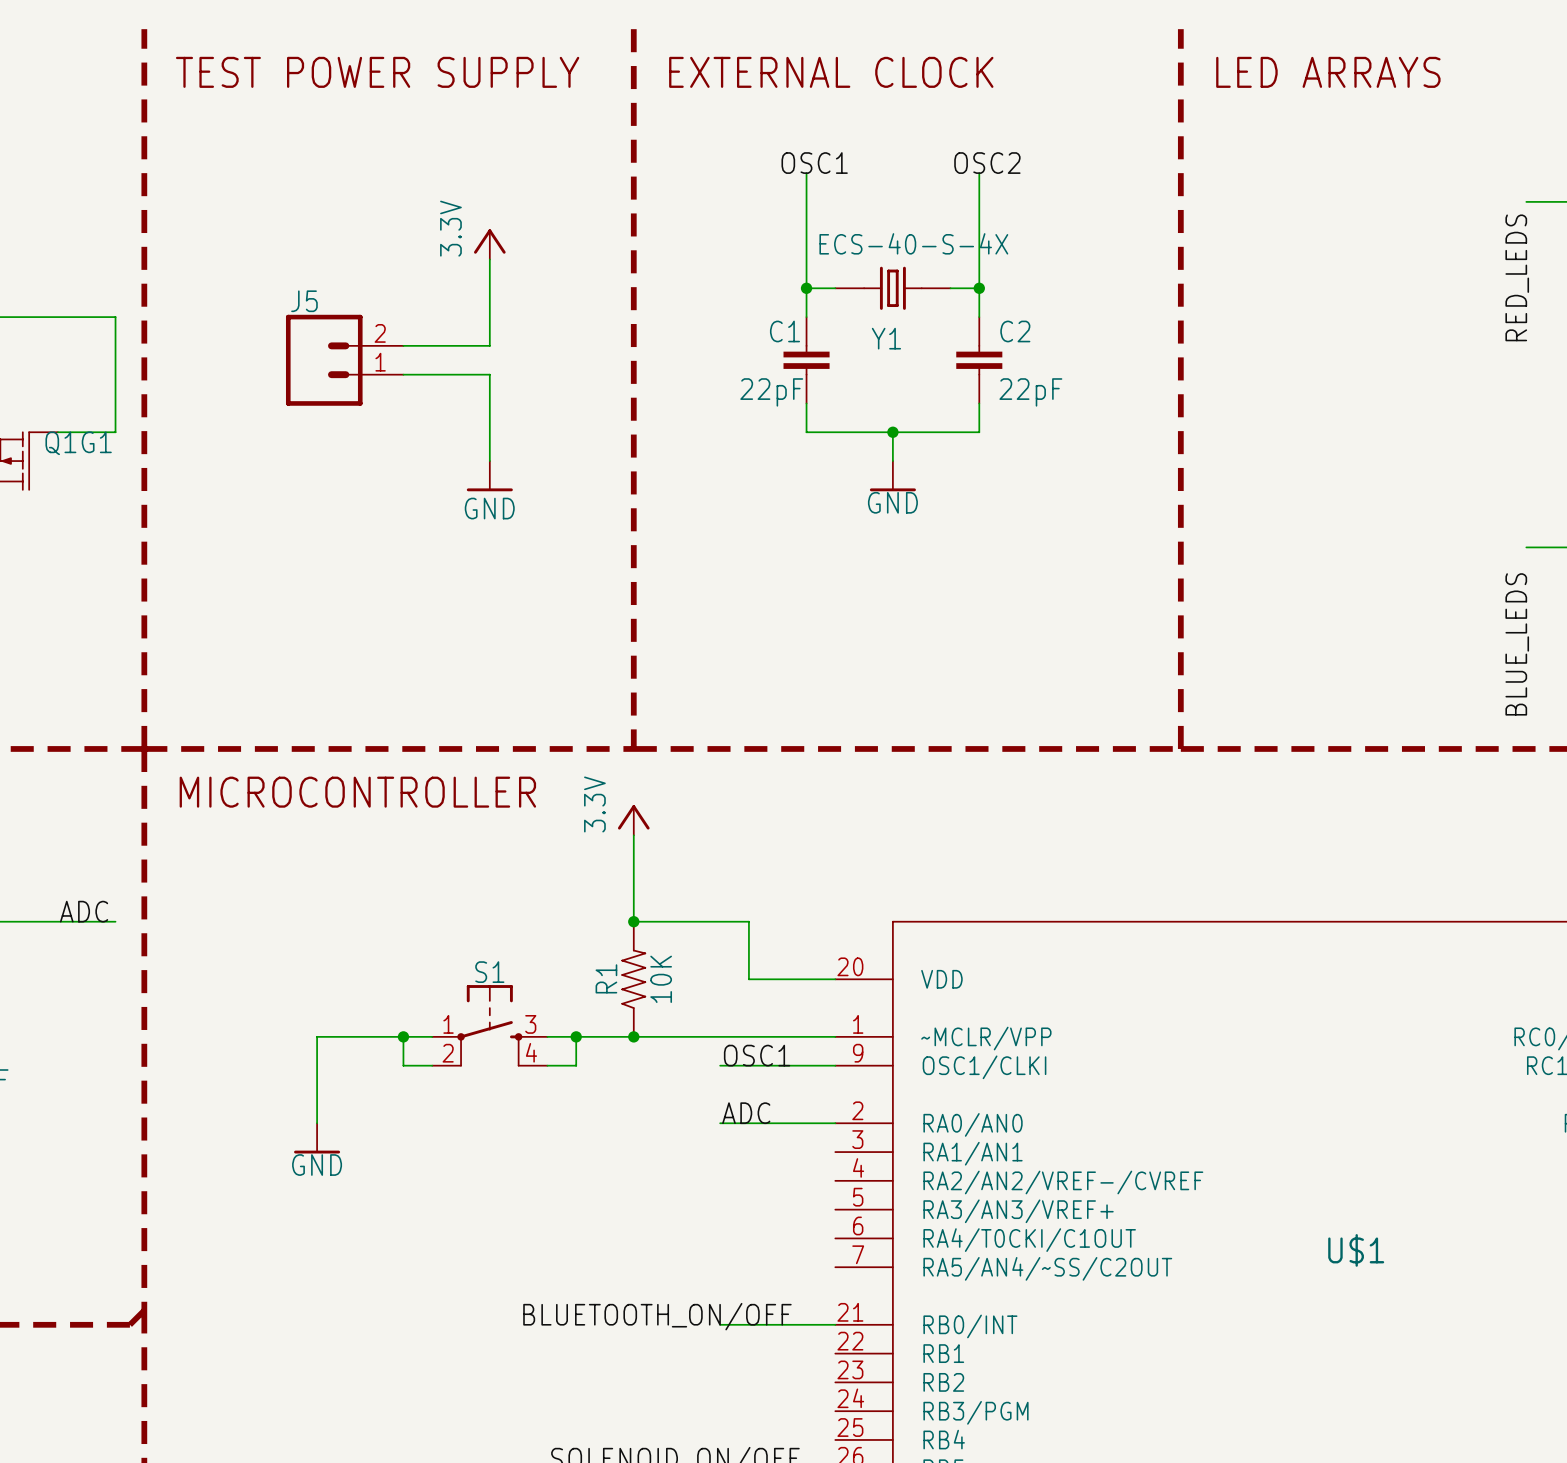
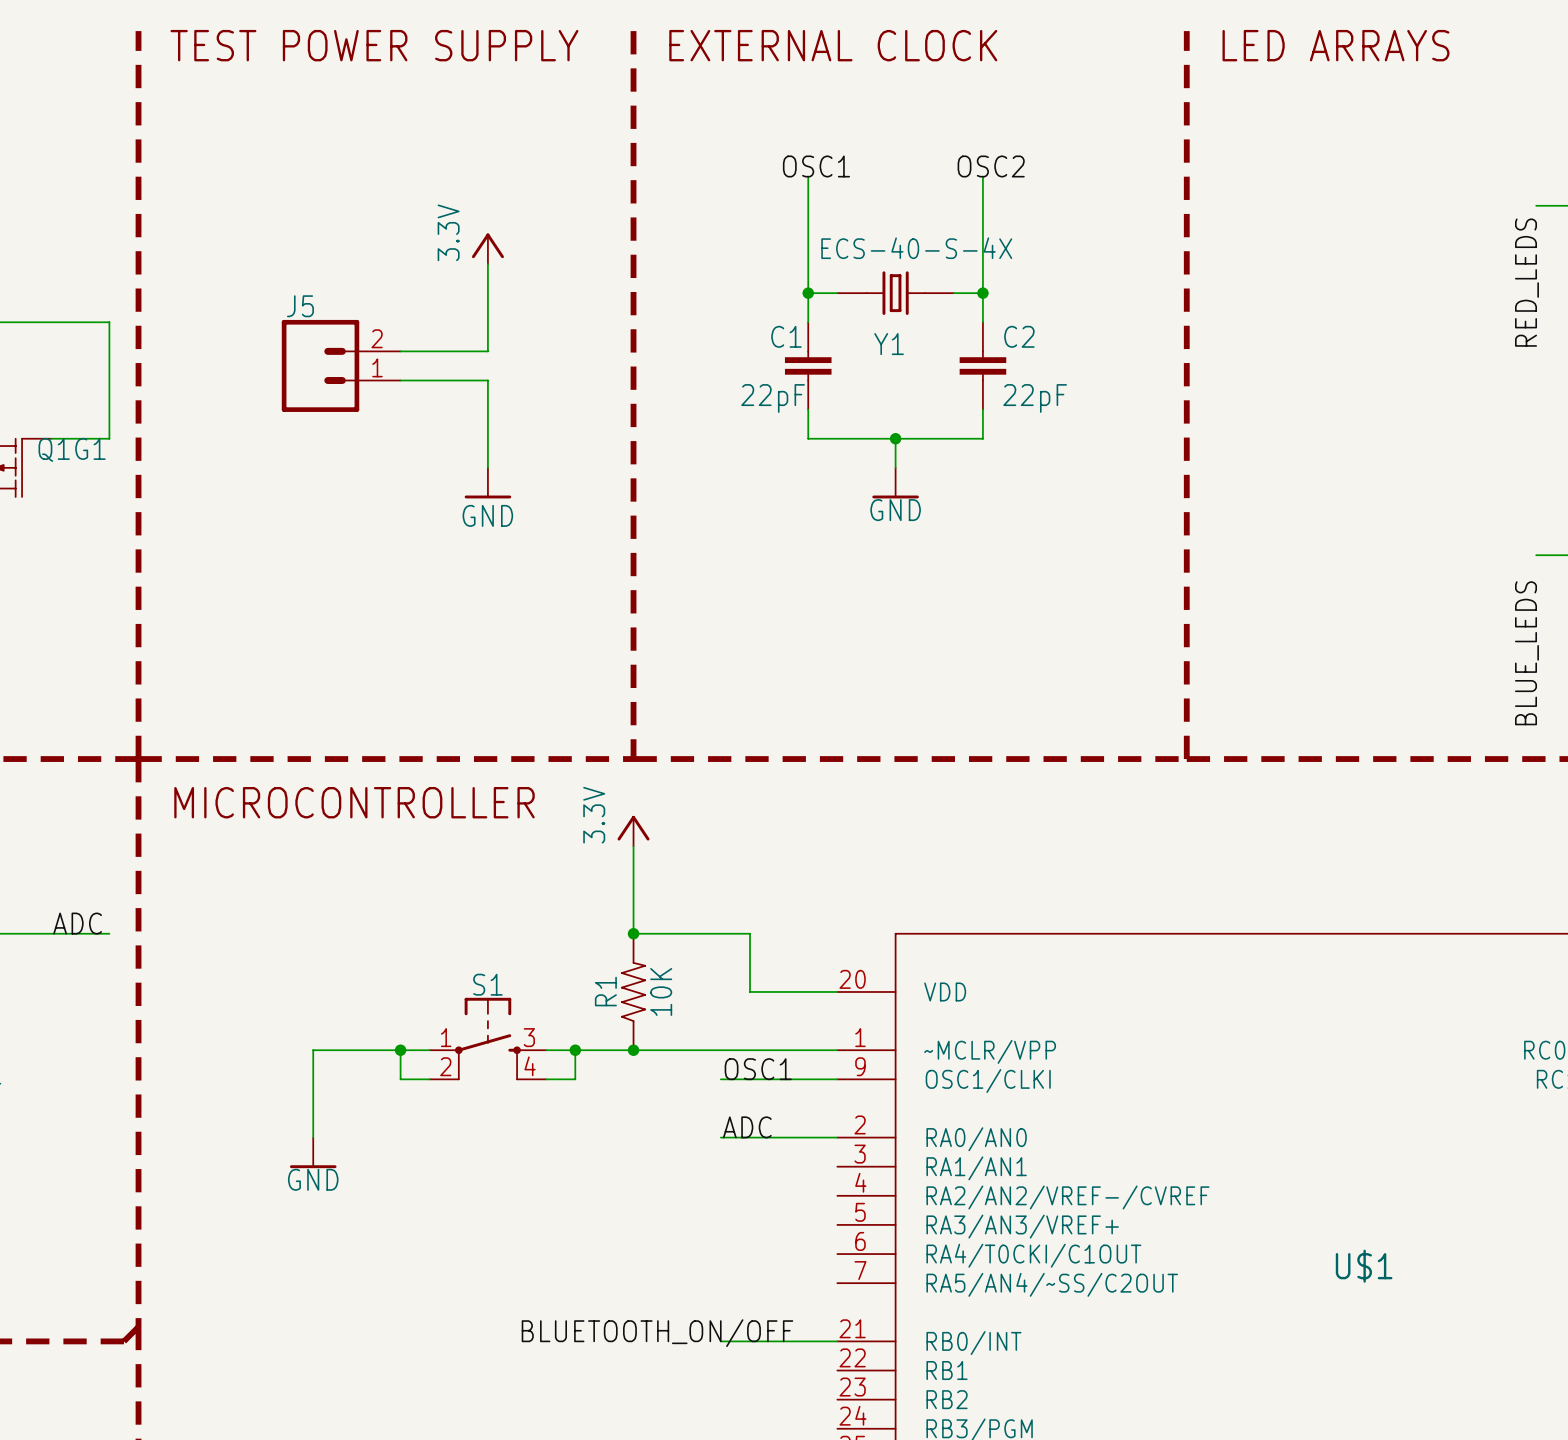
text position: TEST POWER SUPPLY (377, 72) -> TEST POWER SUPPLY (374, 45)
text position: EXTERNAL CLOCK (831, 72) -> EXTERNAL CLOCK (833, 45)
text position: LED ARRAYS (1328, 72) -> LED ARRAYS (1335, 45)

